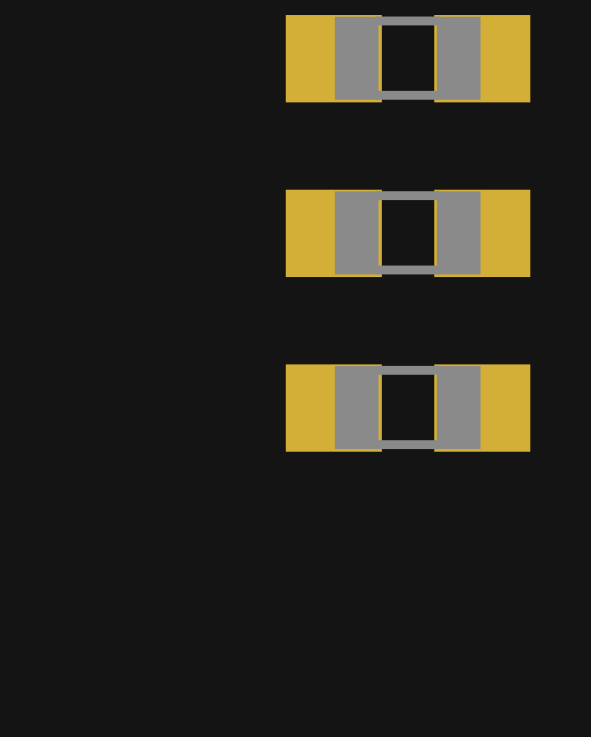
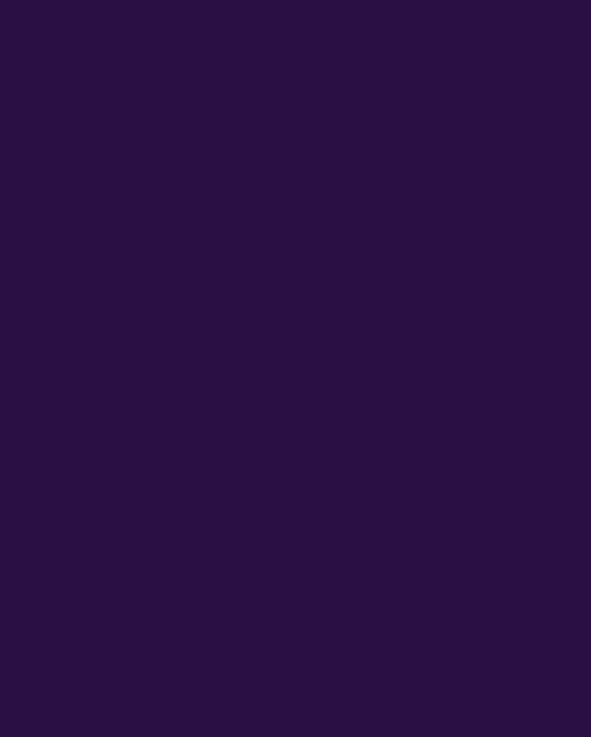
part: (408, 58) -> none
part: (408, 233) -> none
part: (408, 408) -> none

